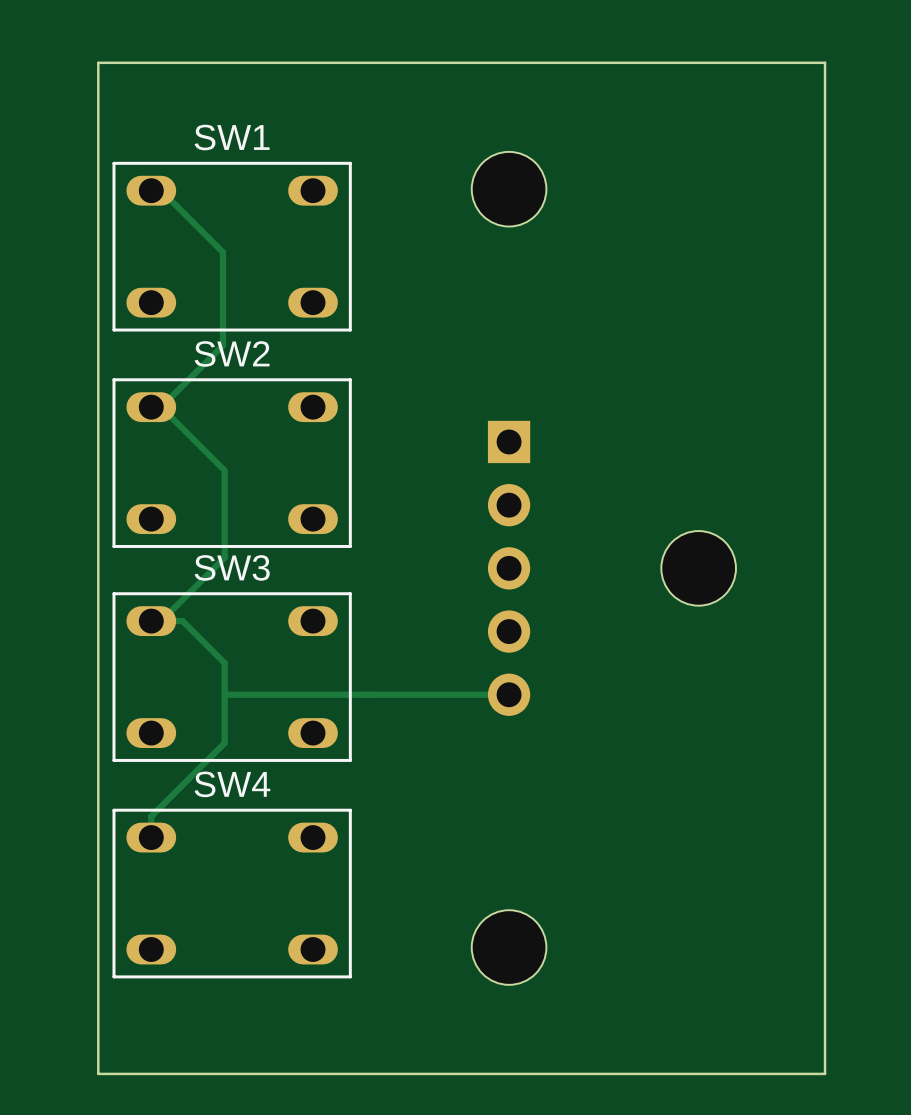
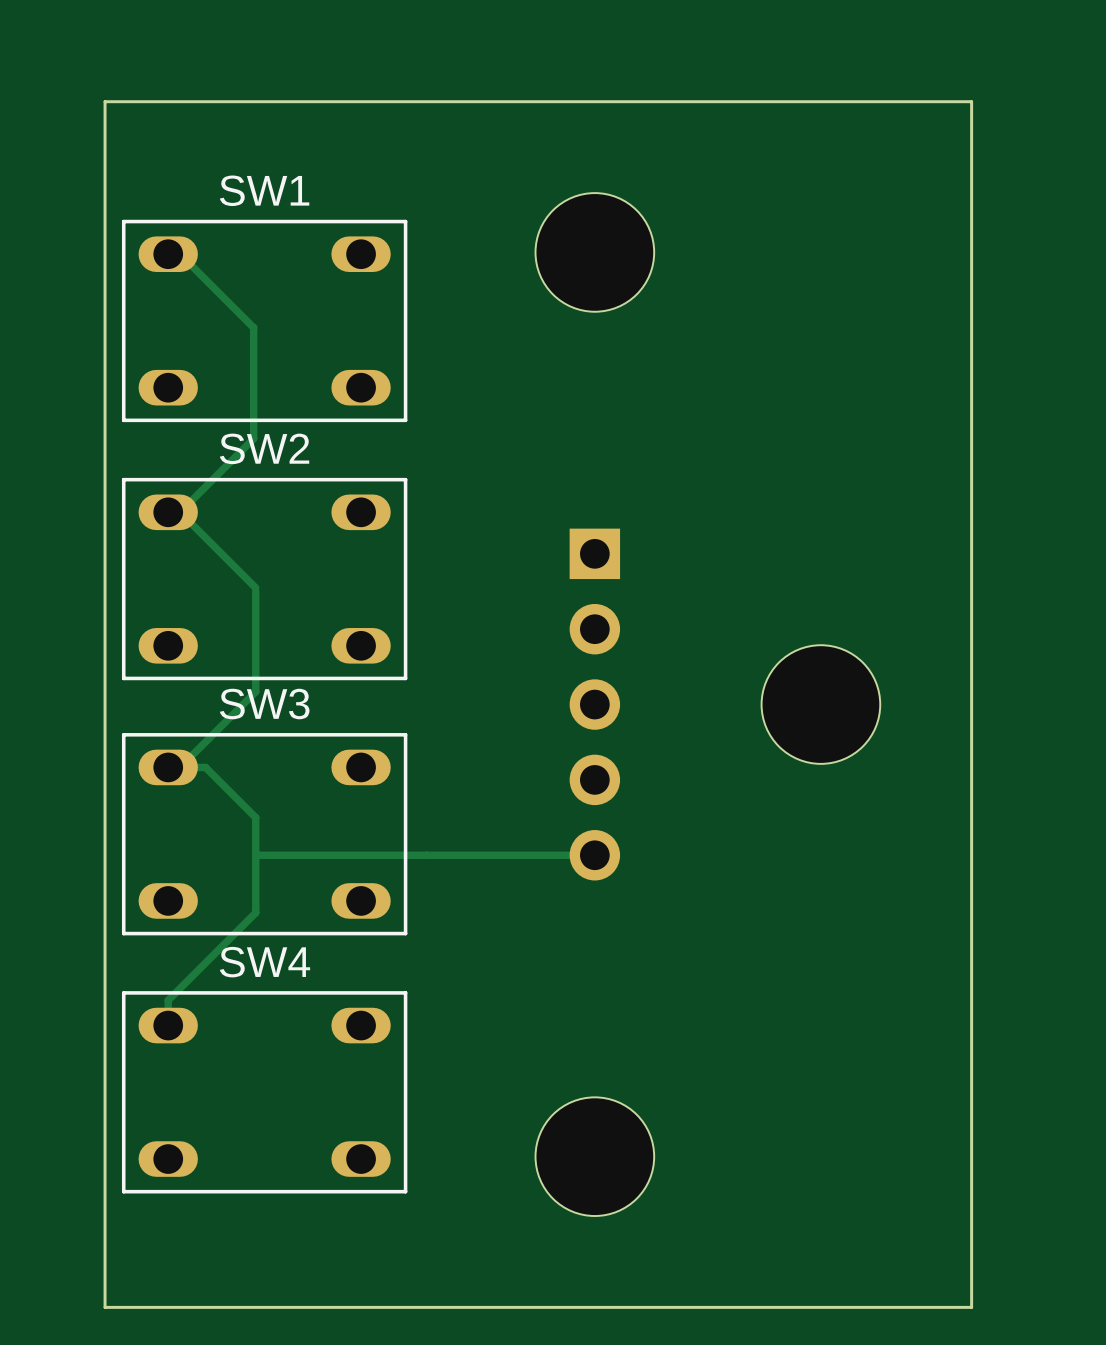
part footprint: [471, 151, 547, 227] -> [535, 193, 655, 312]
part footprint: [661, 531, 736, 606] -> [761, 645, 881, 764]
part footprint: [471, 910, 547, 985] -> [535, 1097, 655, 1217]

